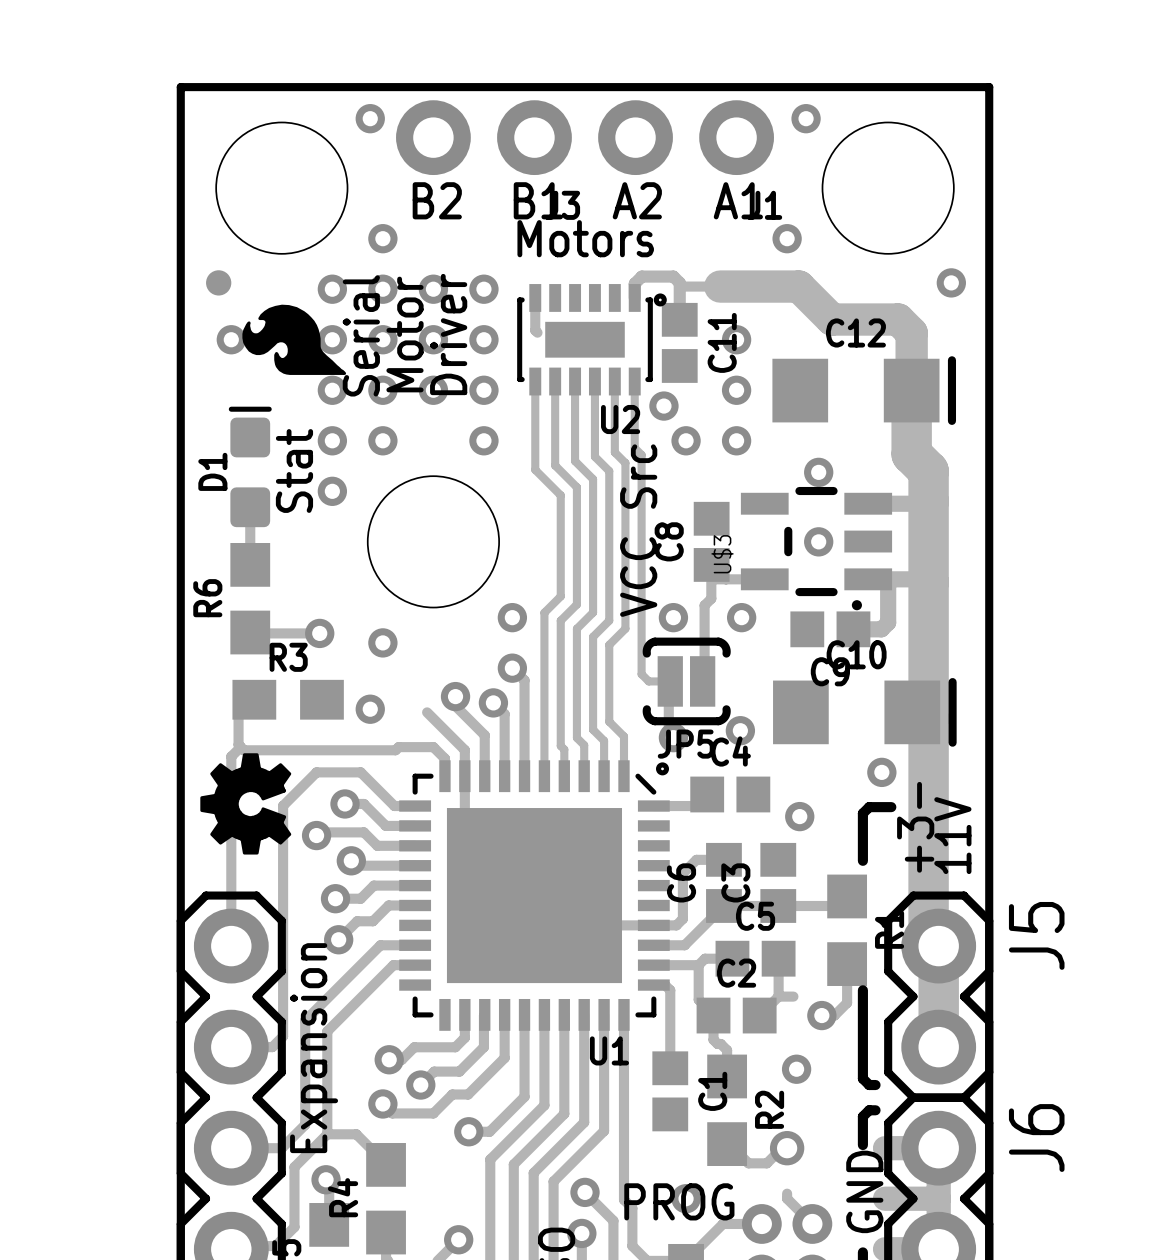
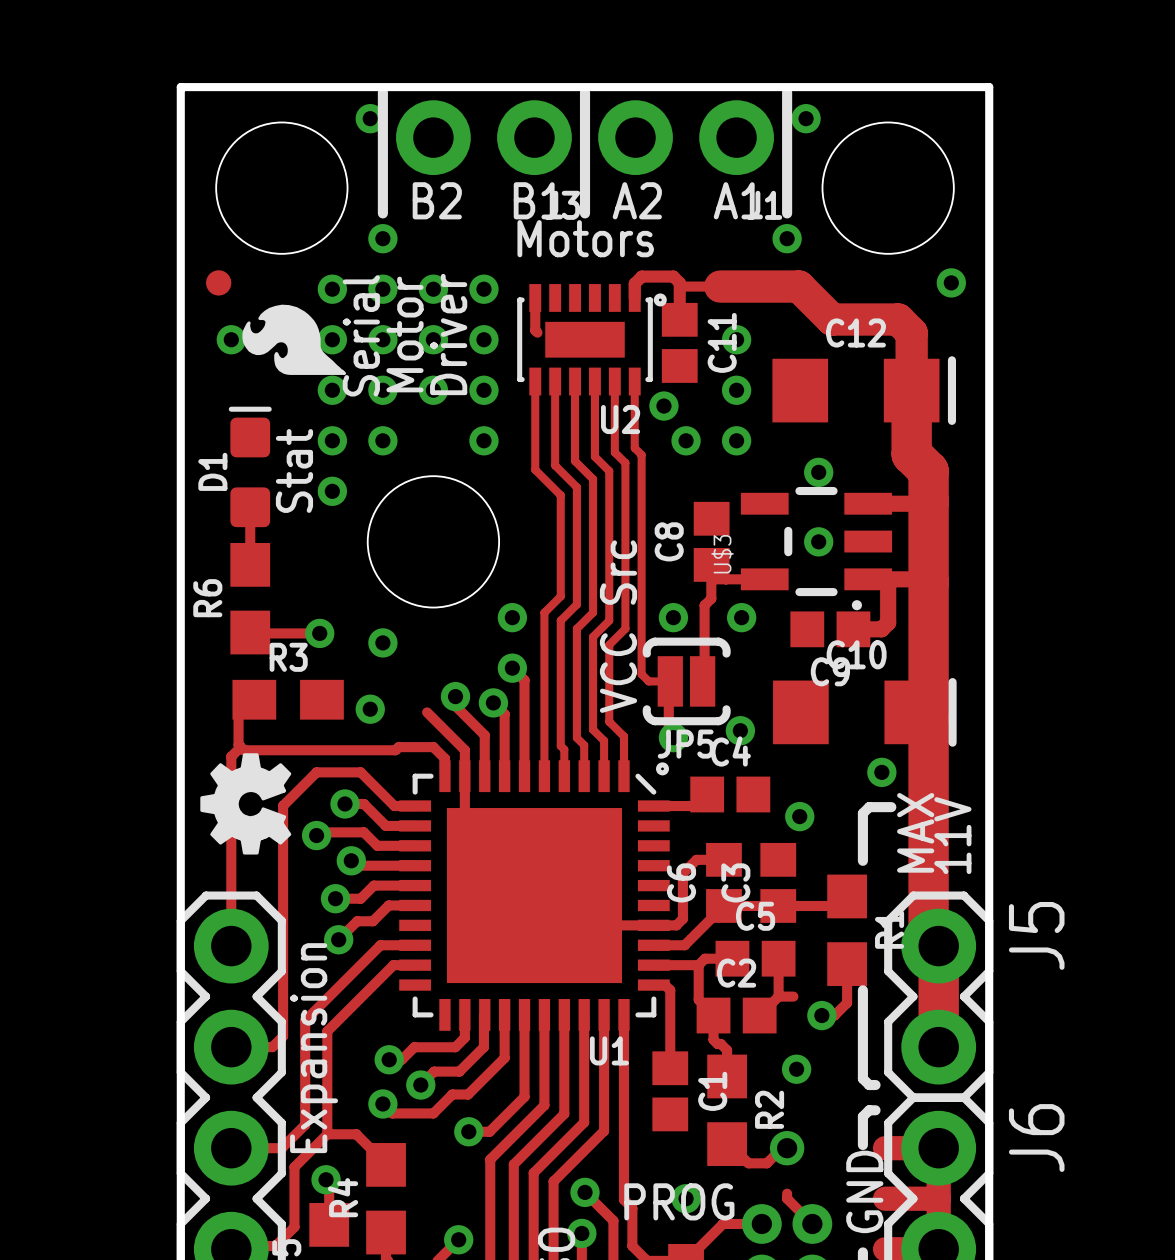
line: none -> (382, 92) (382, 213)
line: none -> (585, 92) (585, 213)
line: none -> (787, 92) (787, 213)
text position: VCC Src (638, 530) -> VCC Src (618, 626)
text: +3- (915, 827) -> MAX (915, 832)

